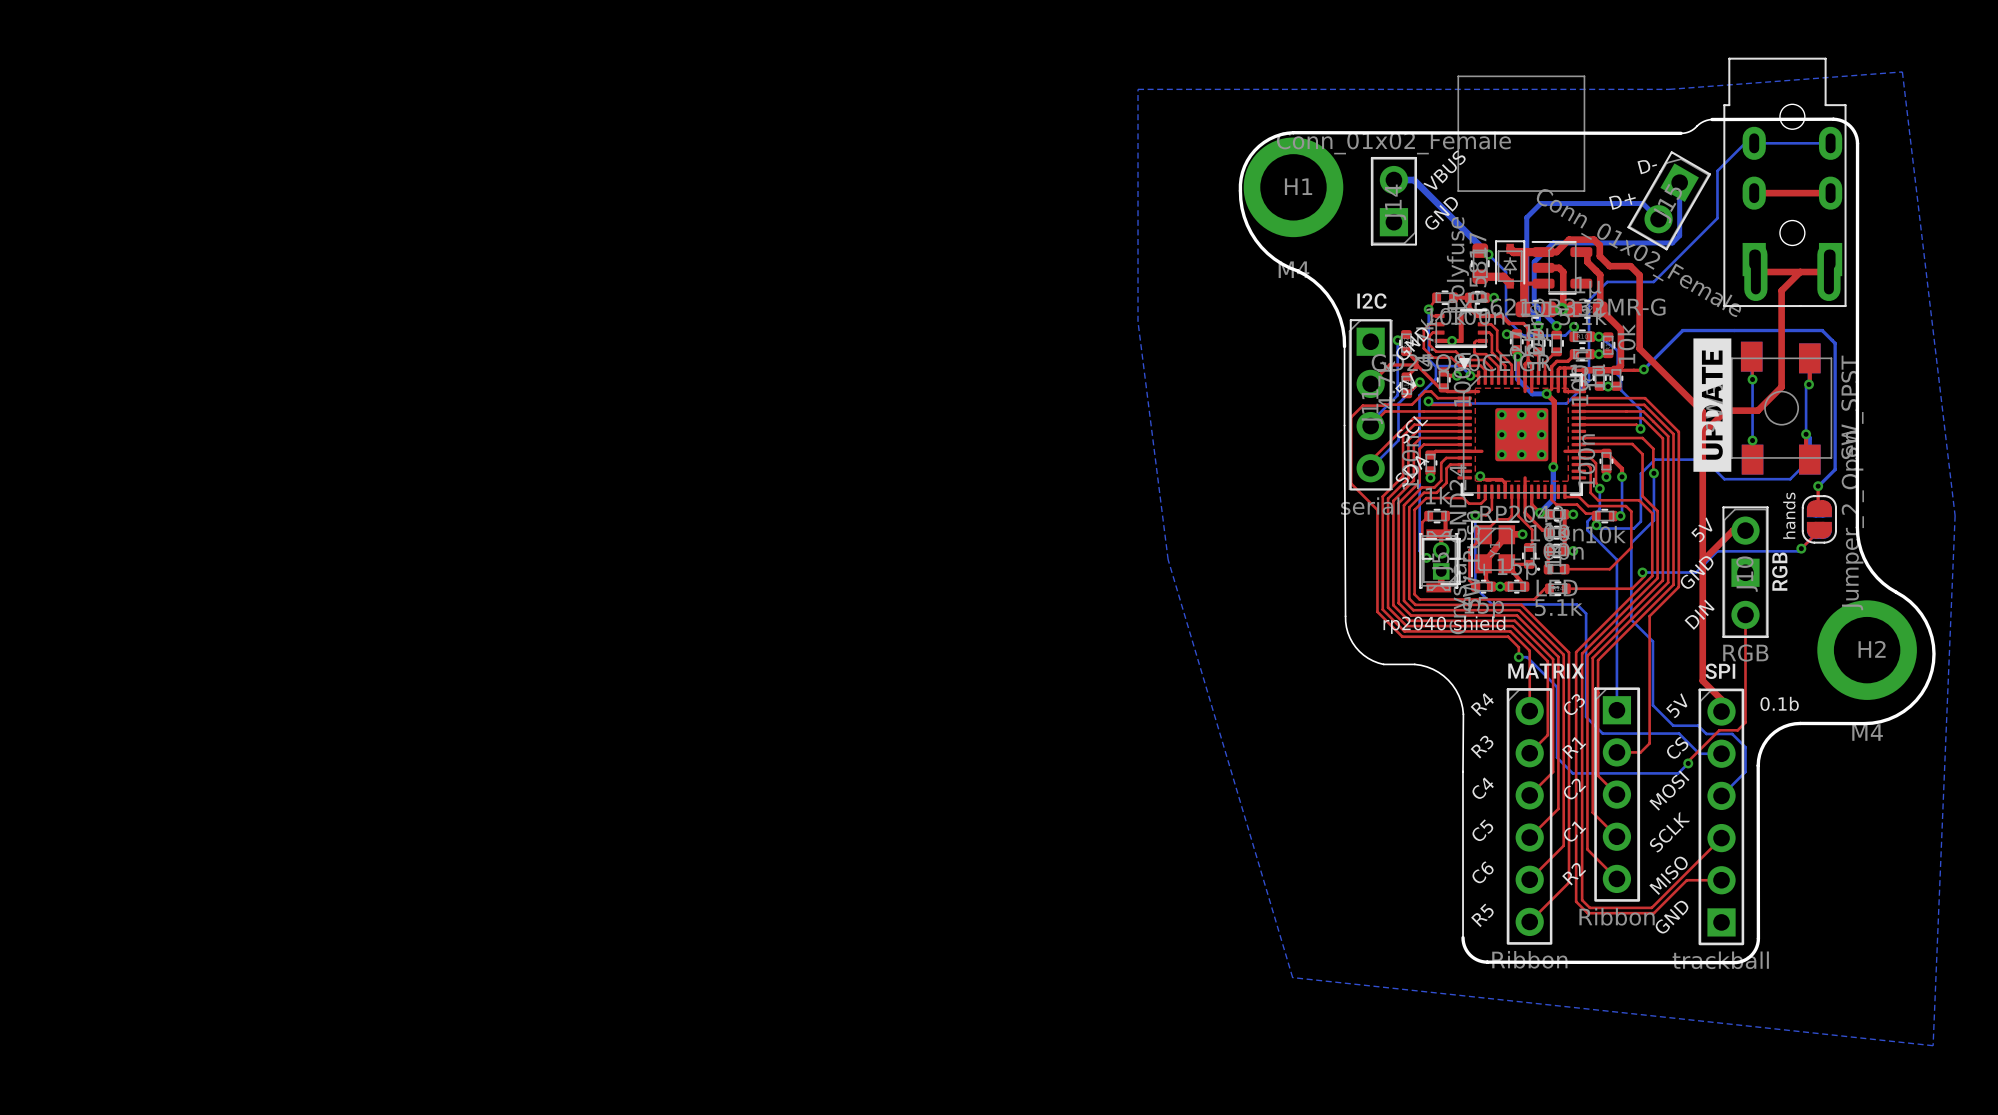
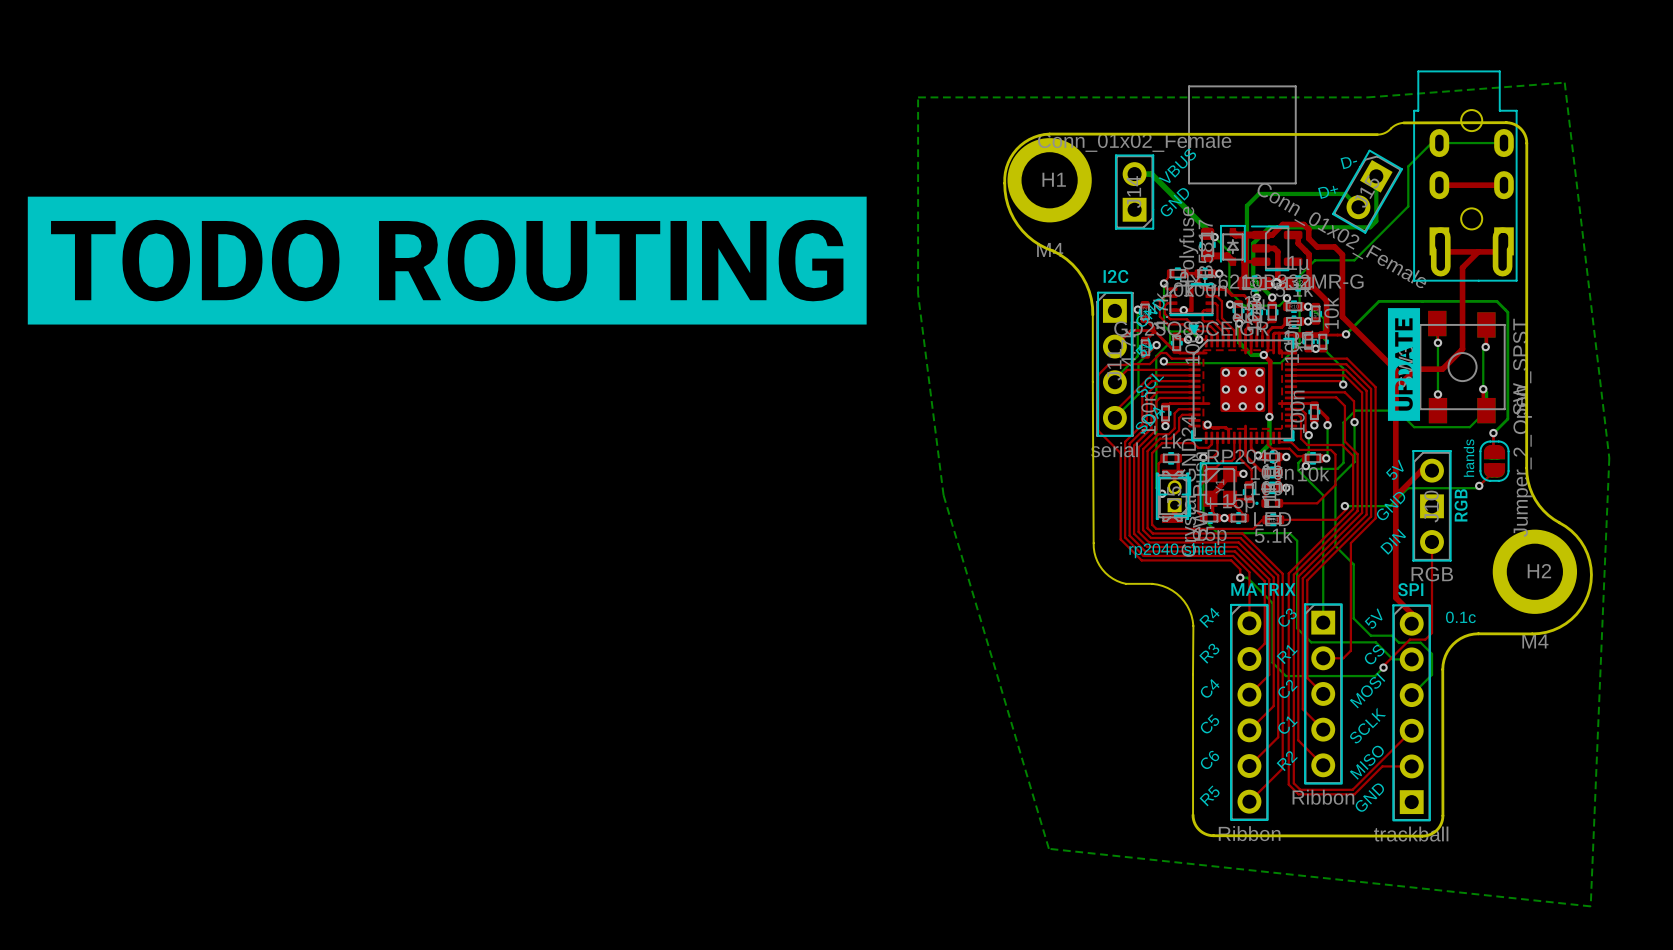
drawing: none -> [27, 196, 867, 325]
text: 0.1b (1779, 703) -> 0.1c (1460, 617)

